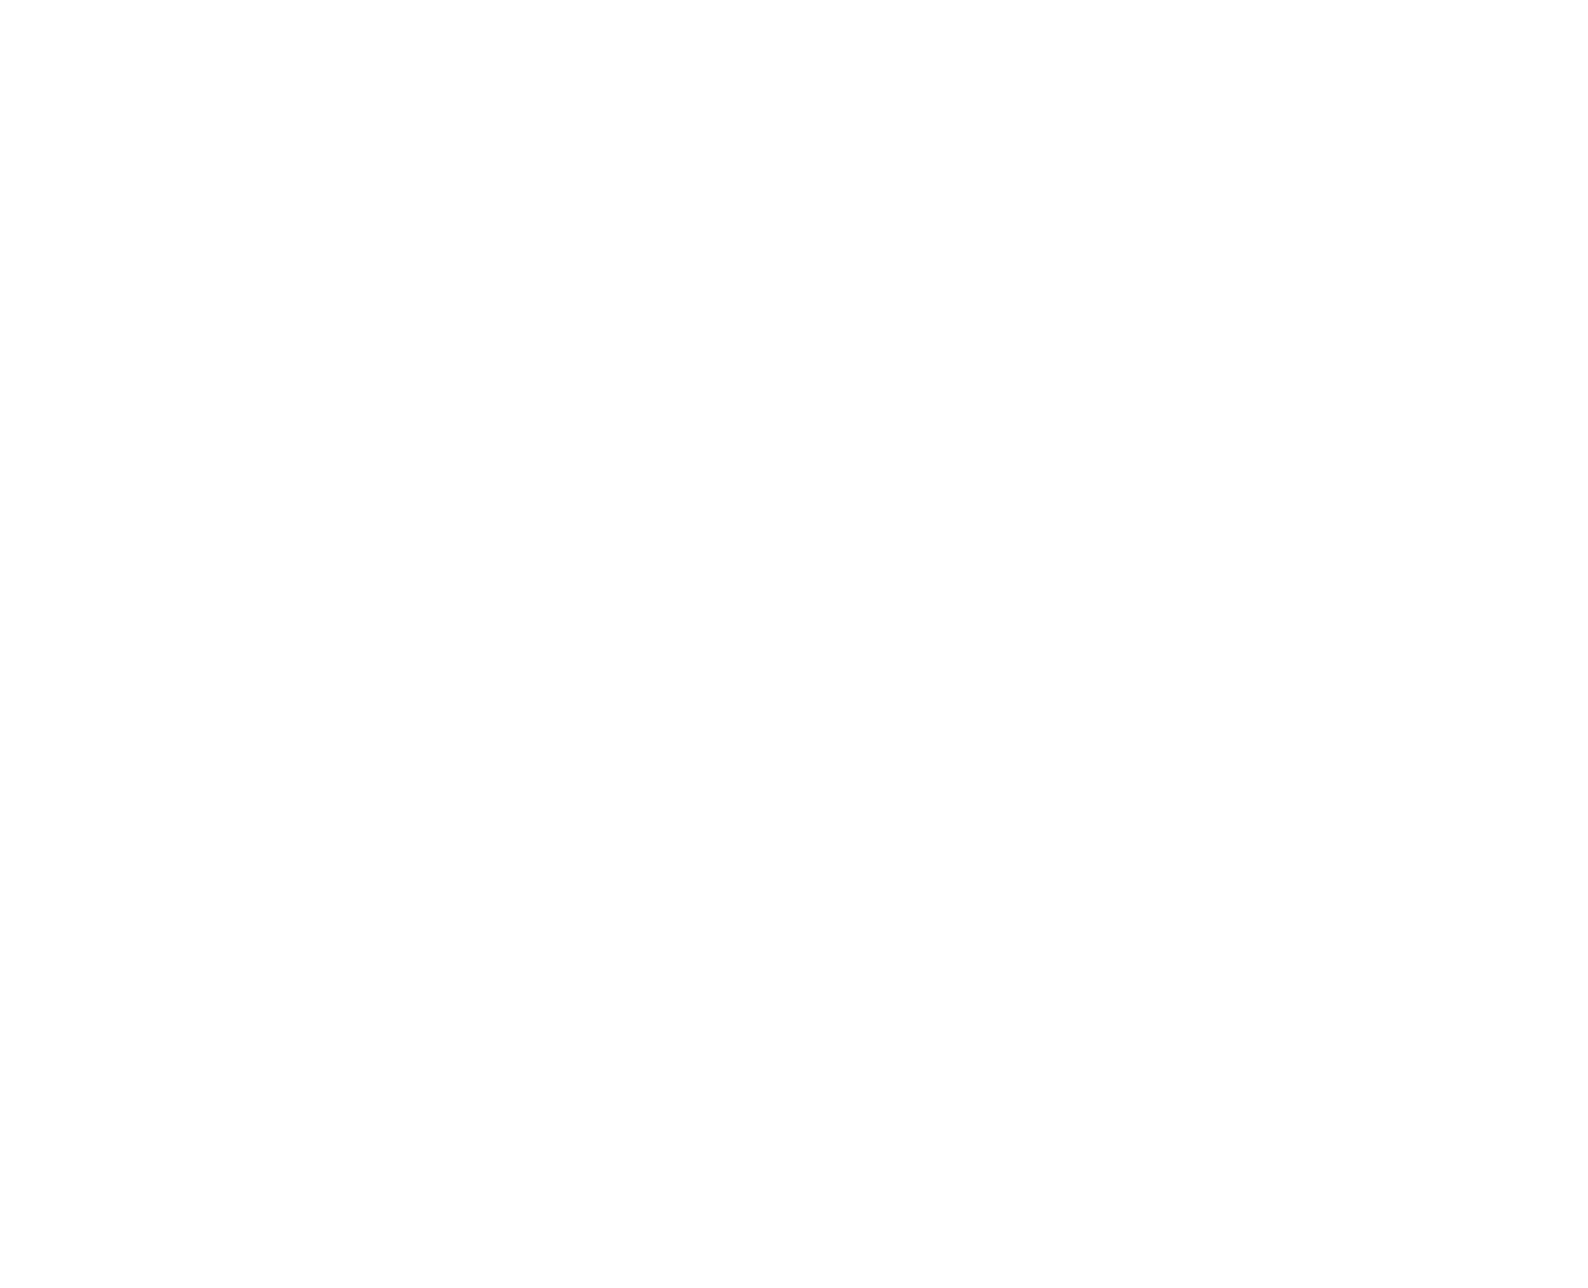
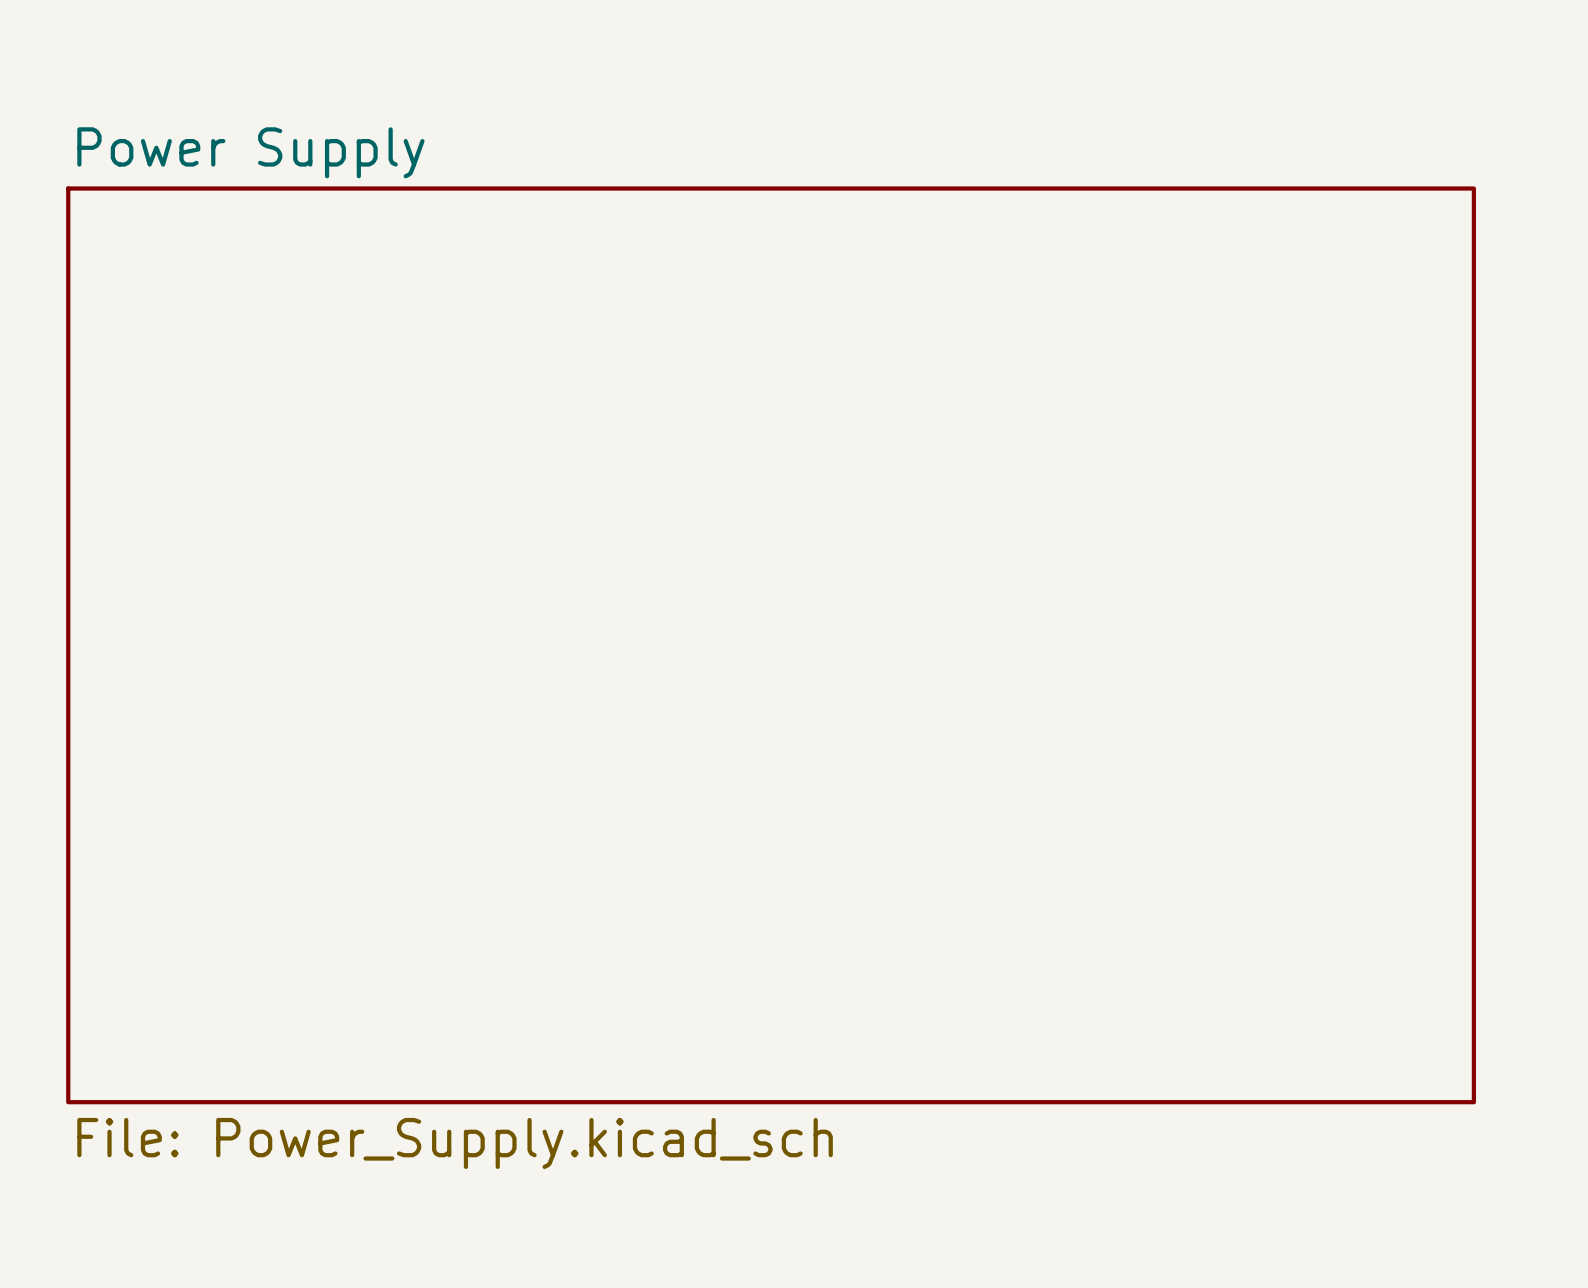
sheet Power Supply: none -> File: Power_Supply.kicad_sch (771, 645)

